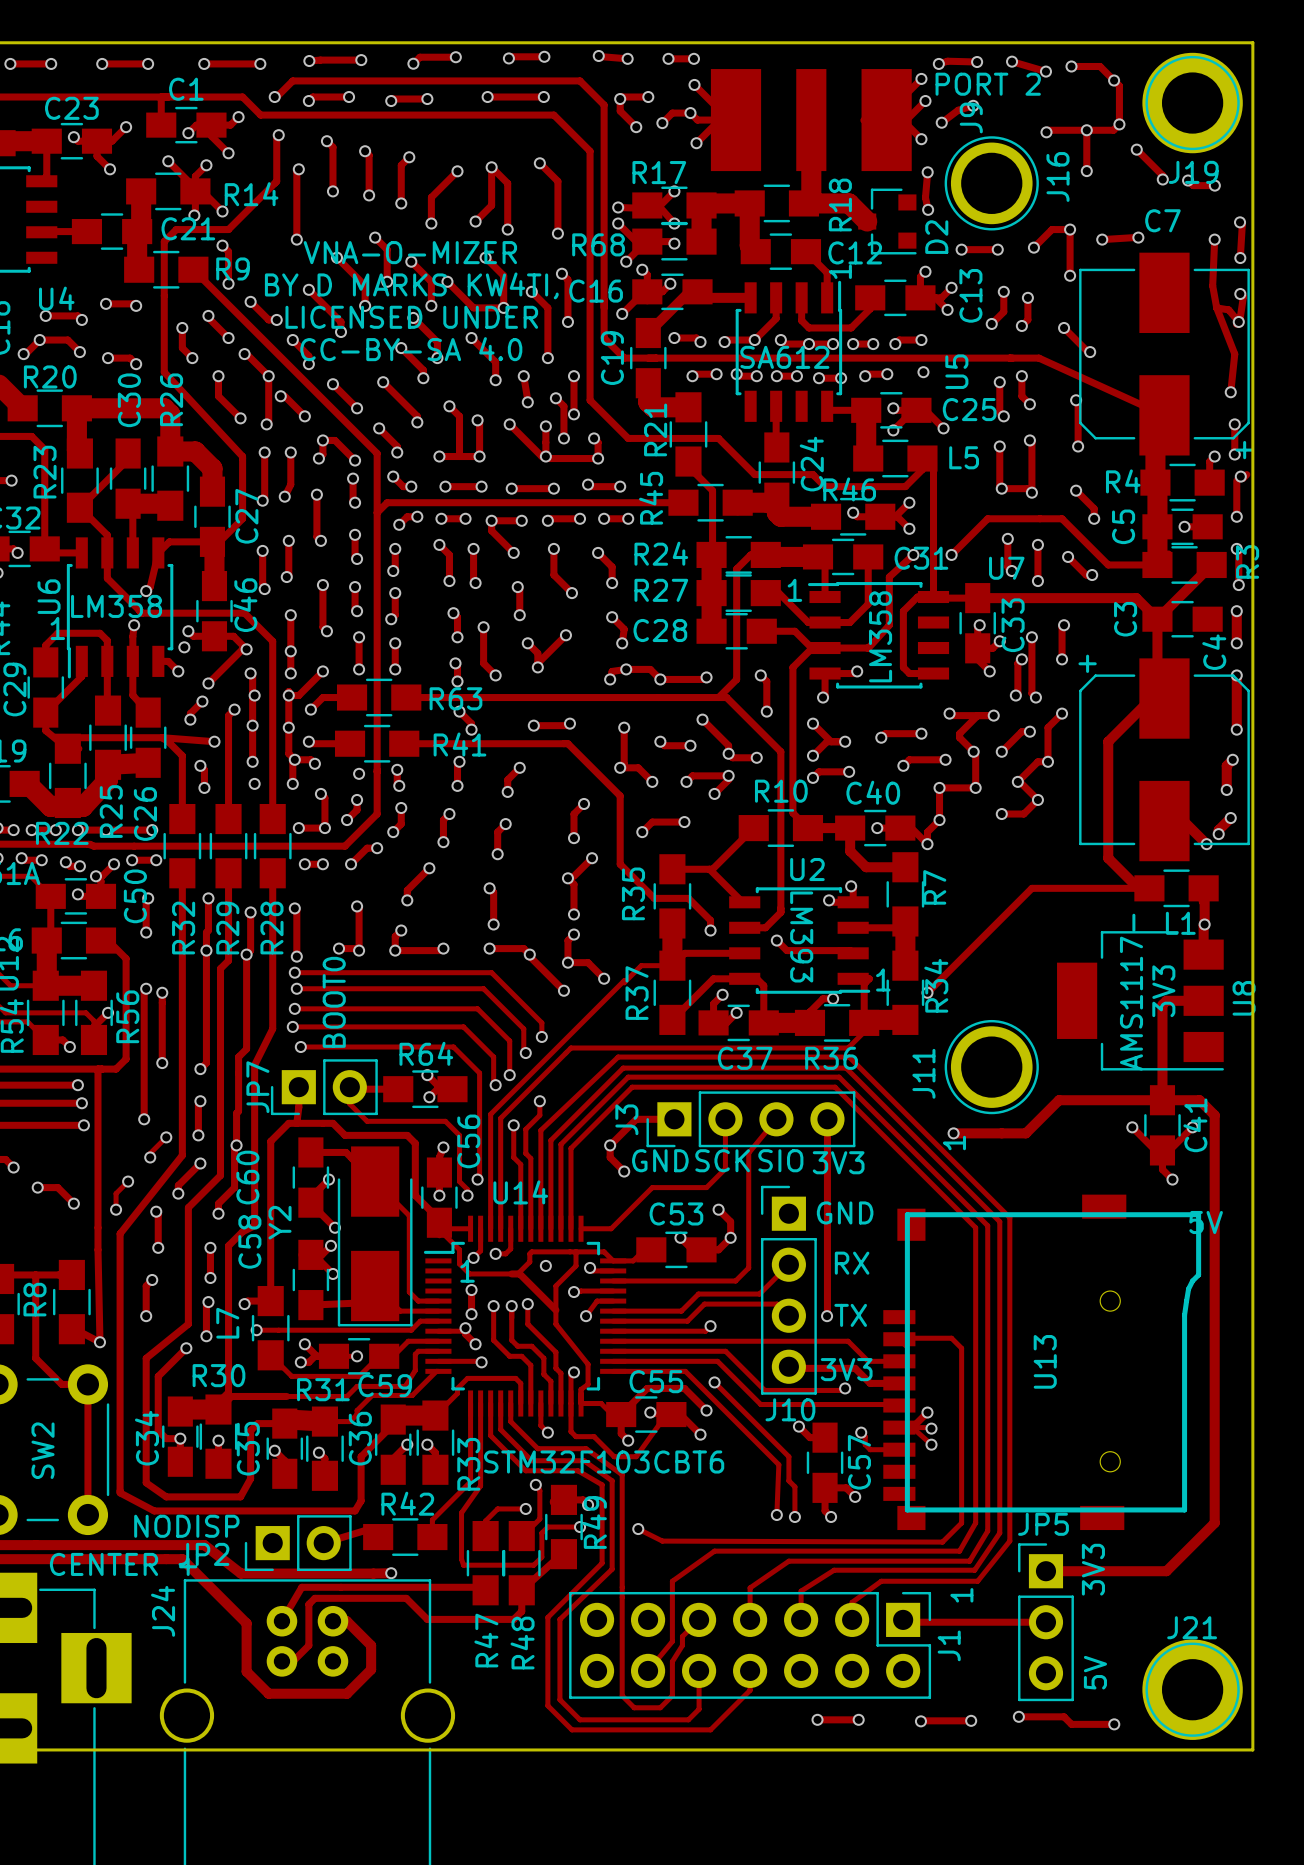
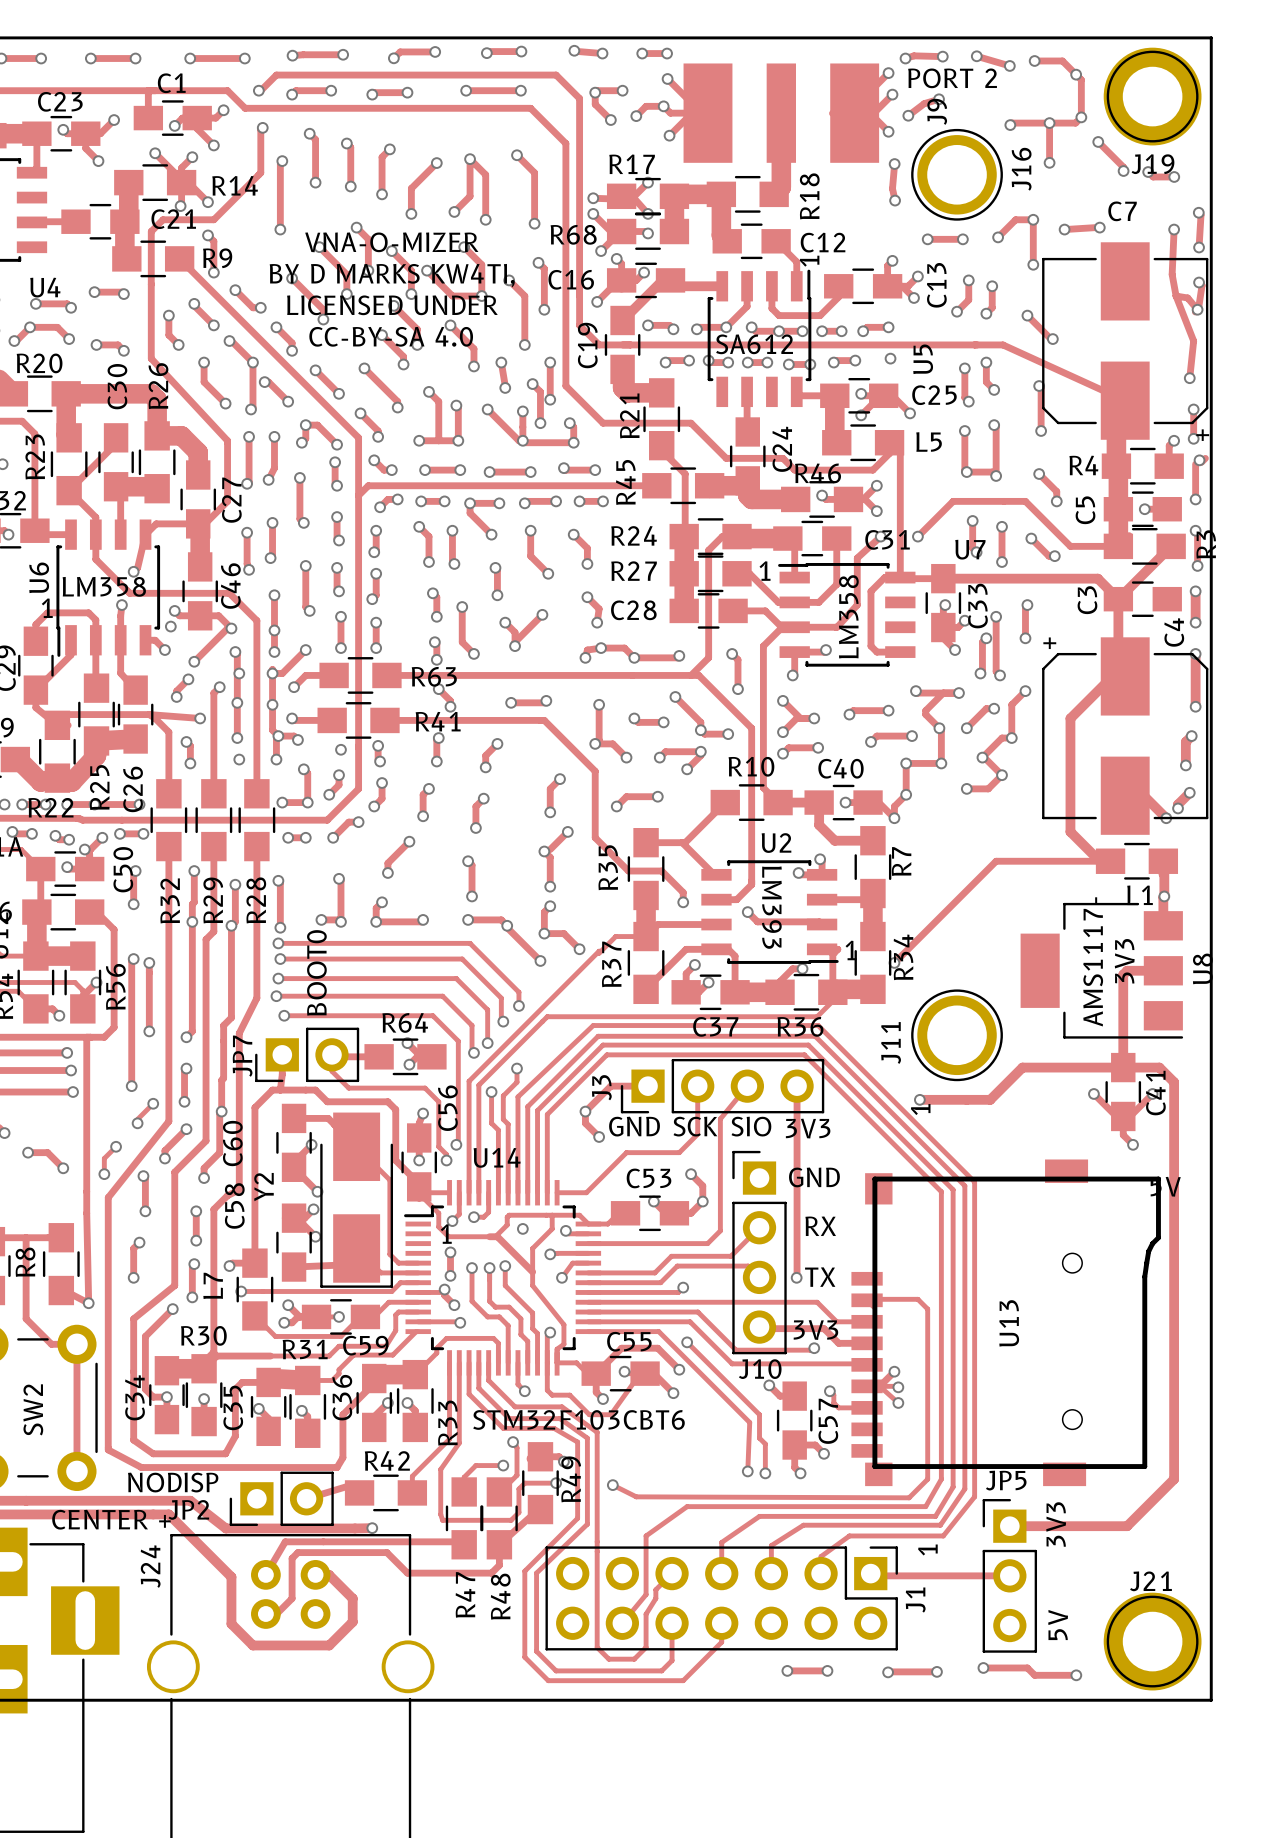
track: (803, 203) (849, 203) (867, 221) -> none
D2: (887, 221) -> none

